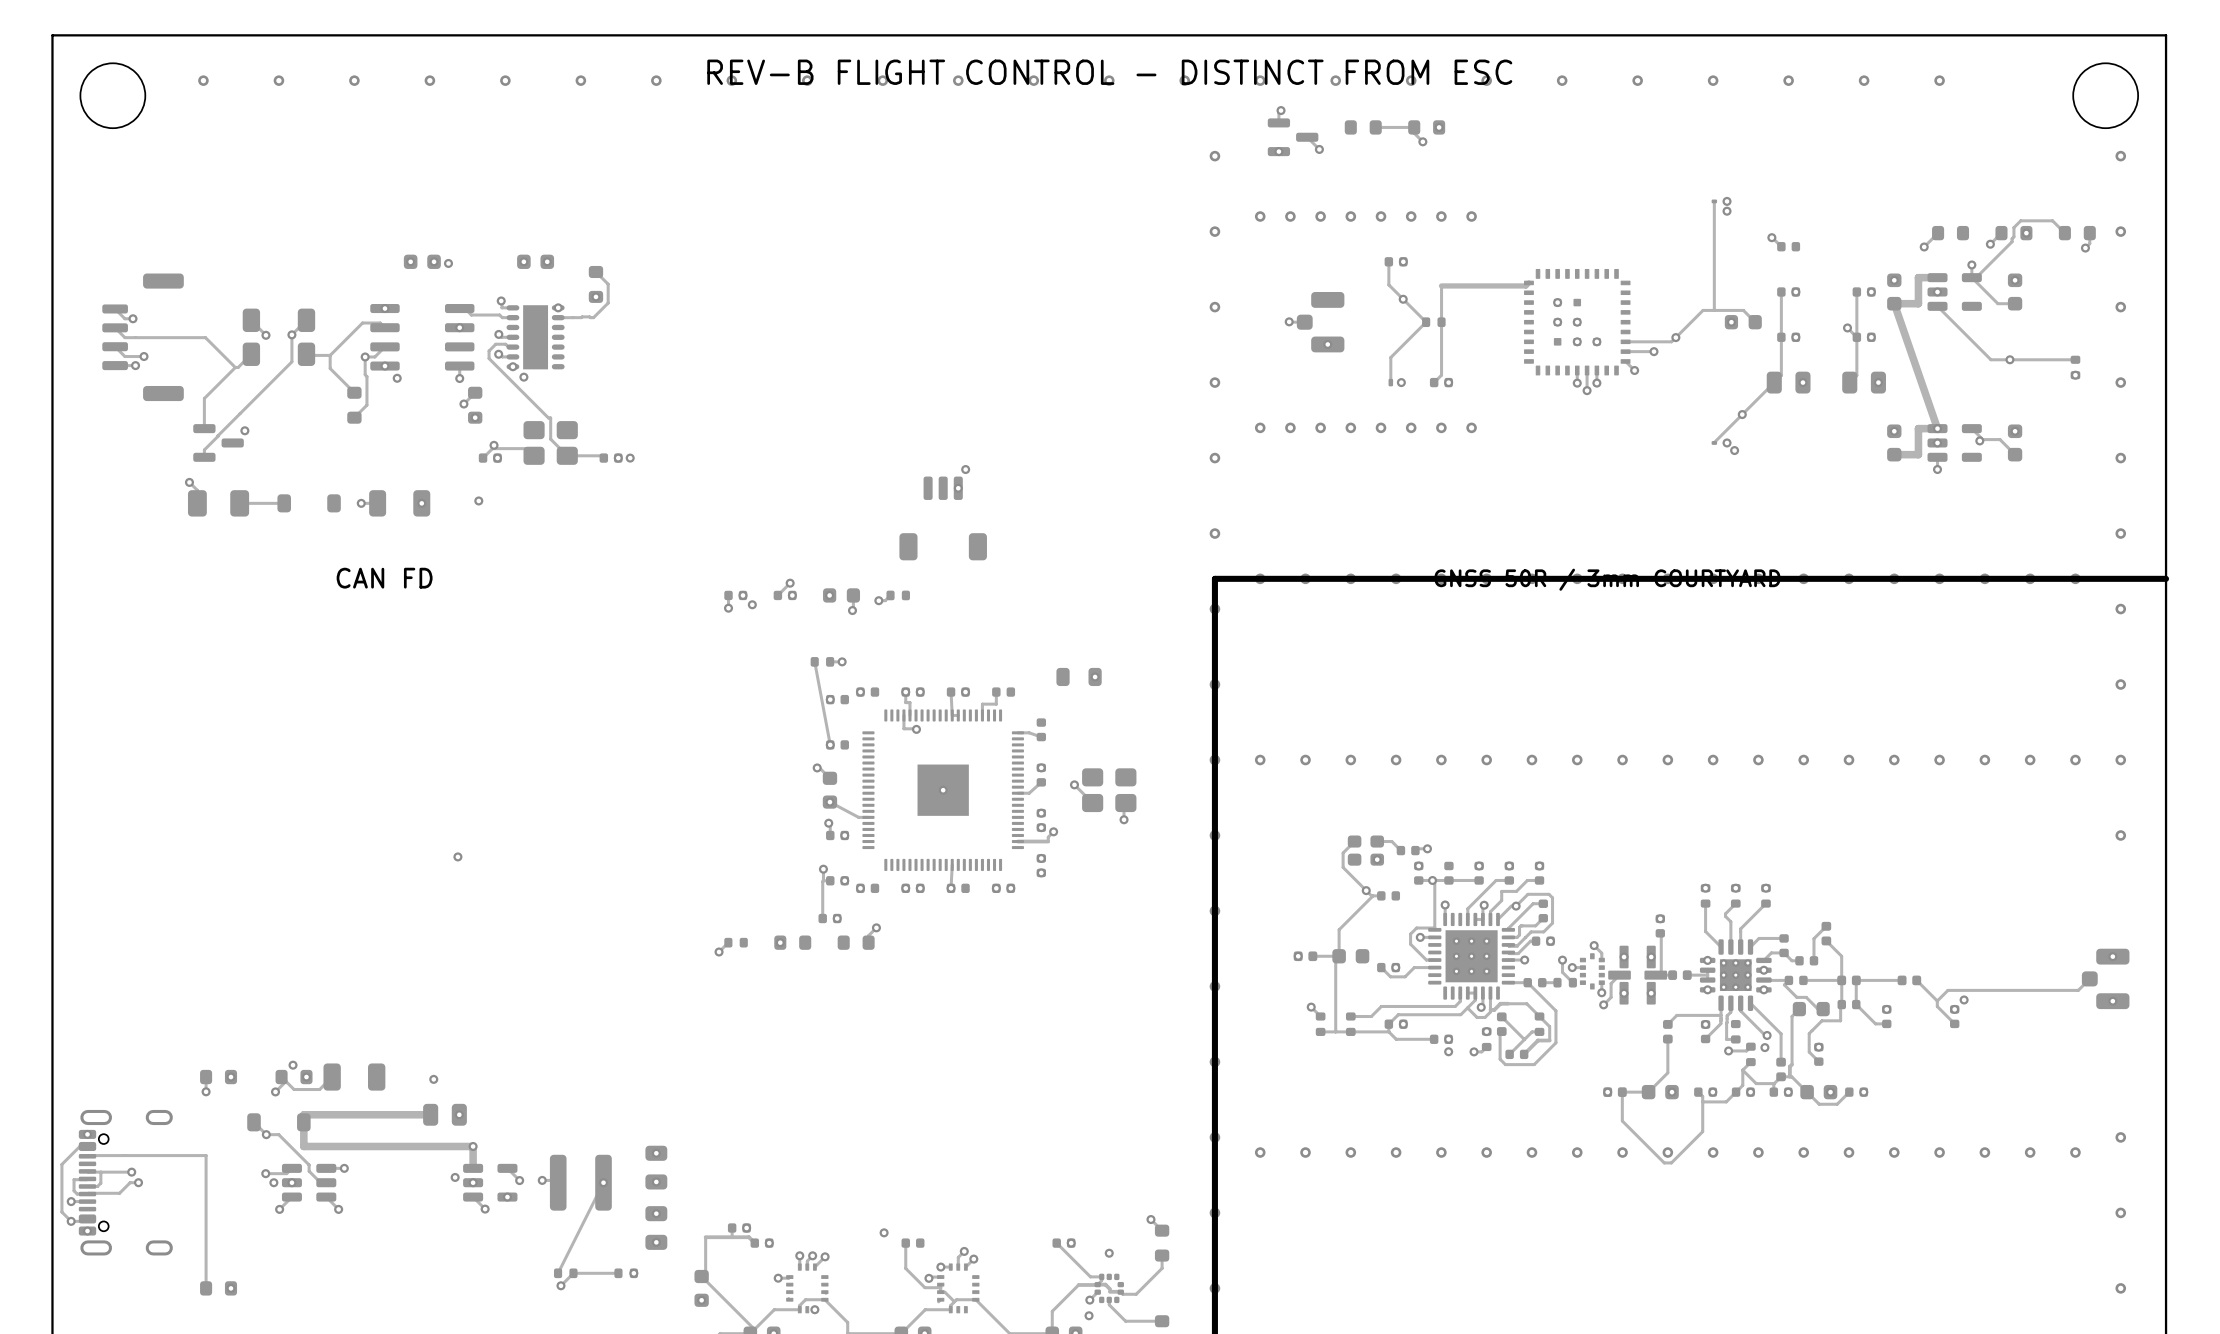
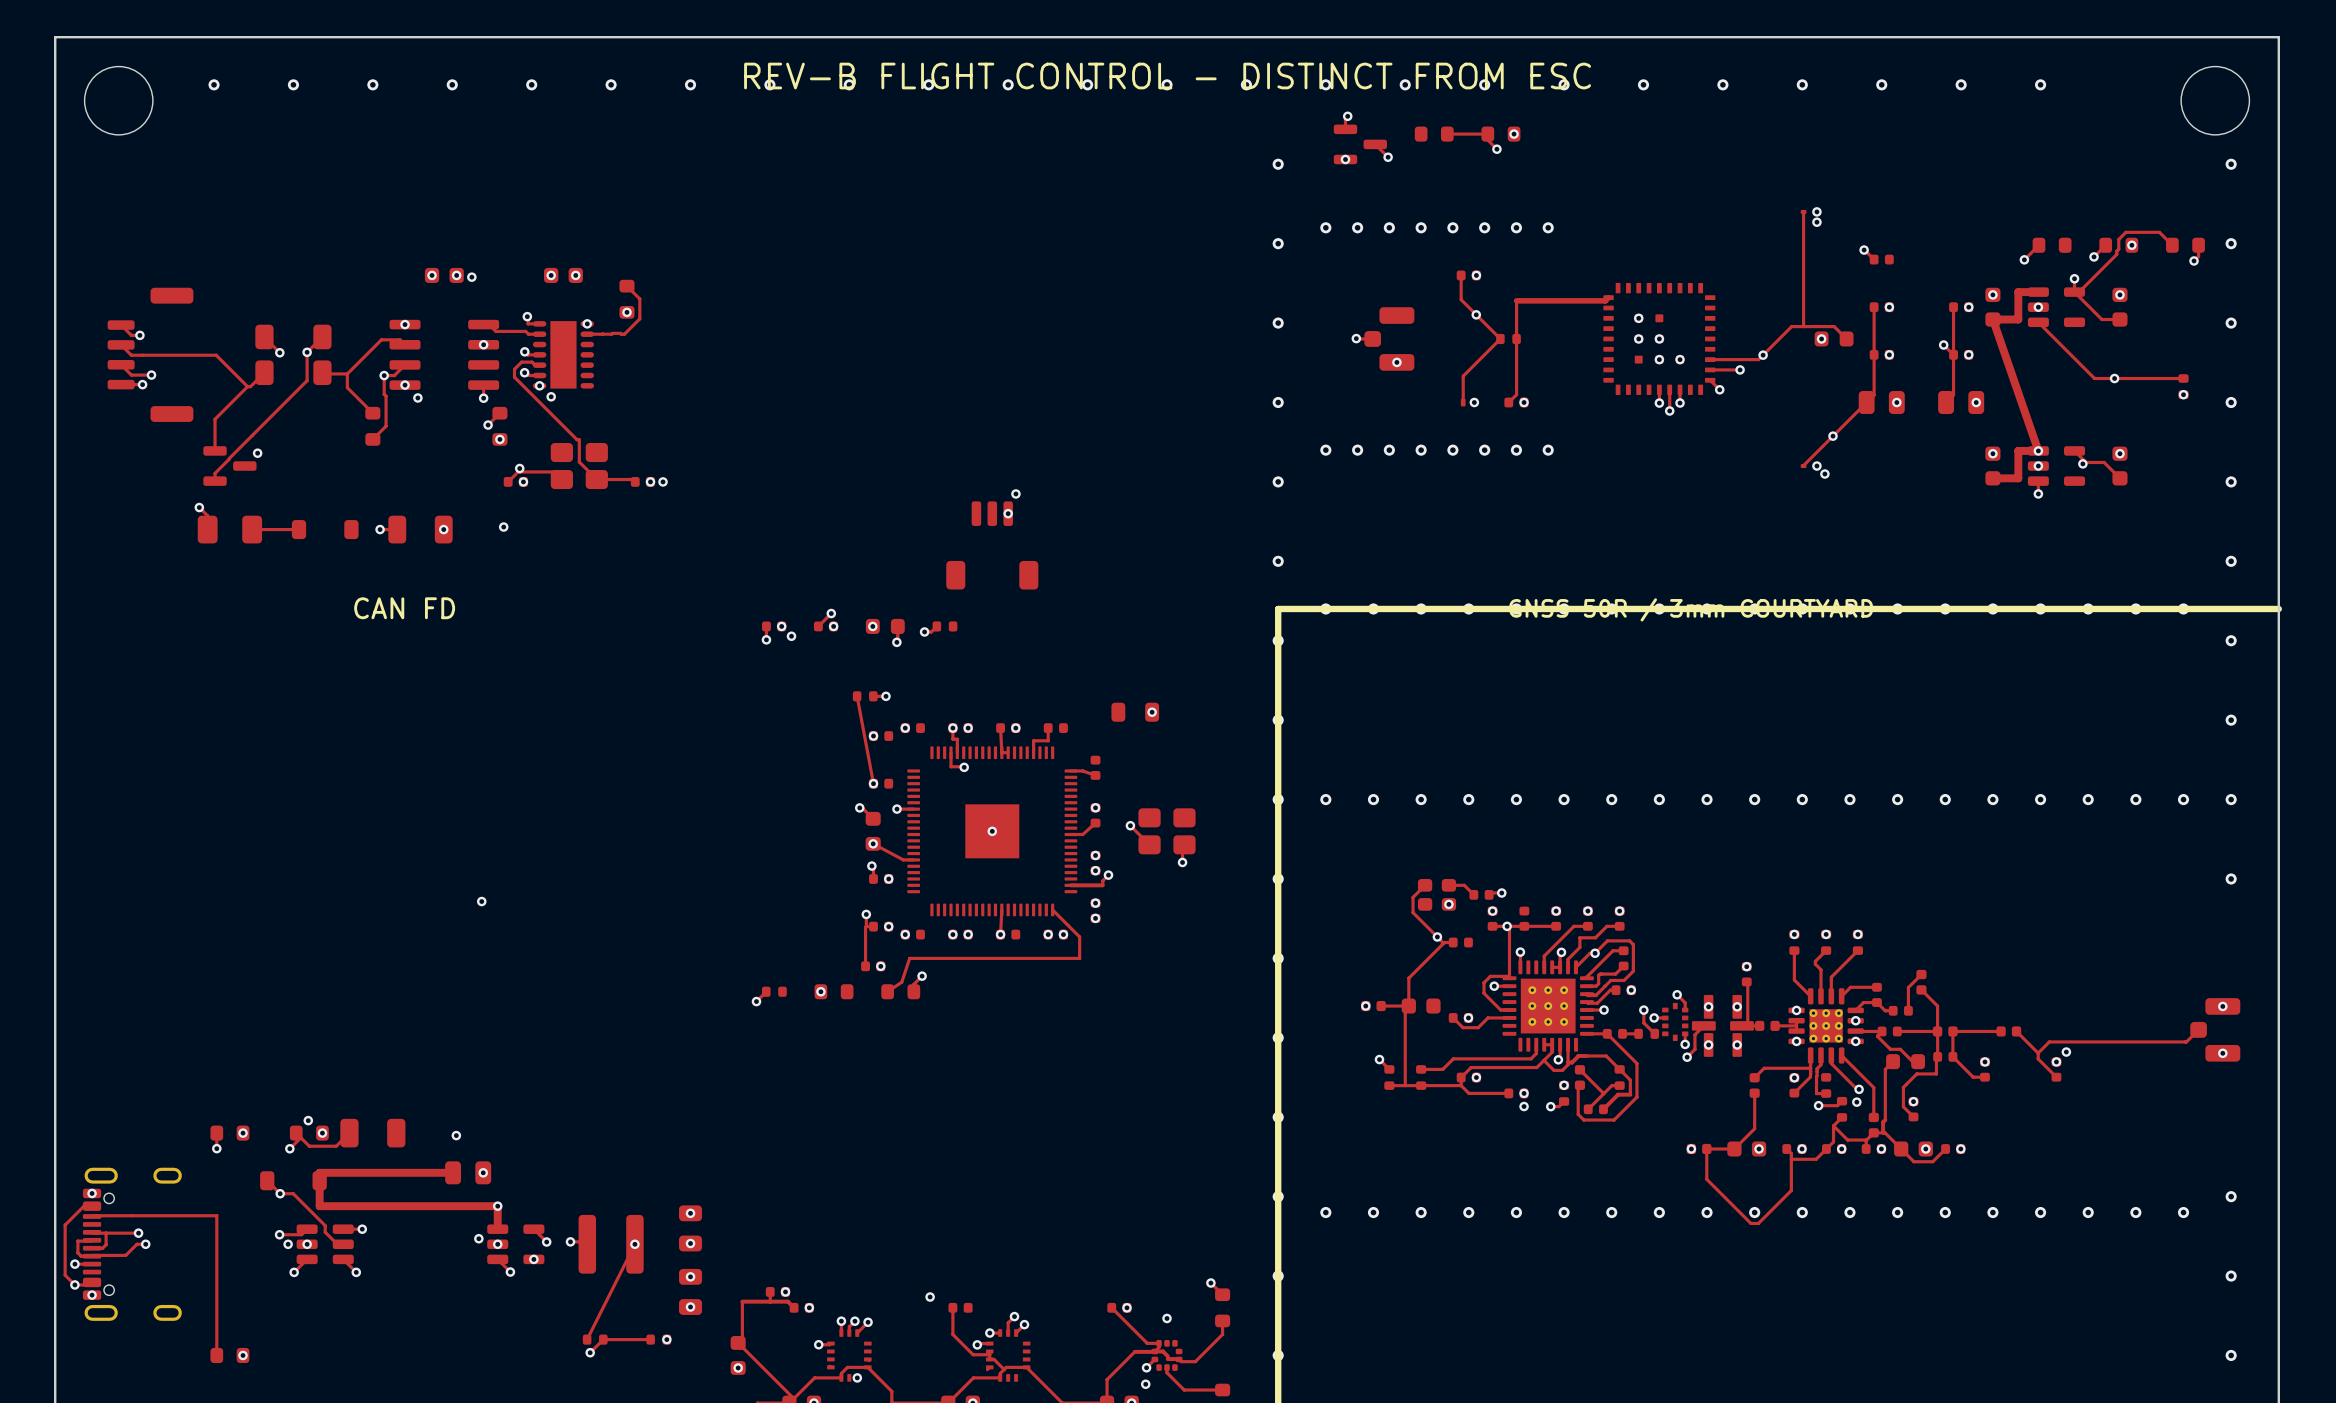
track: none -> (897, 809) (913, 809)
via: none -> (897, 809)
track: none -> (1052, 909) (1079, 936) (1079, 958) (909, 958) (901, 982) (887, 991)

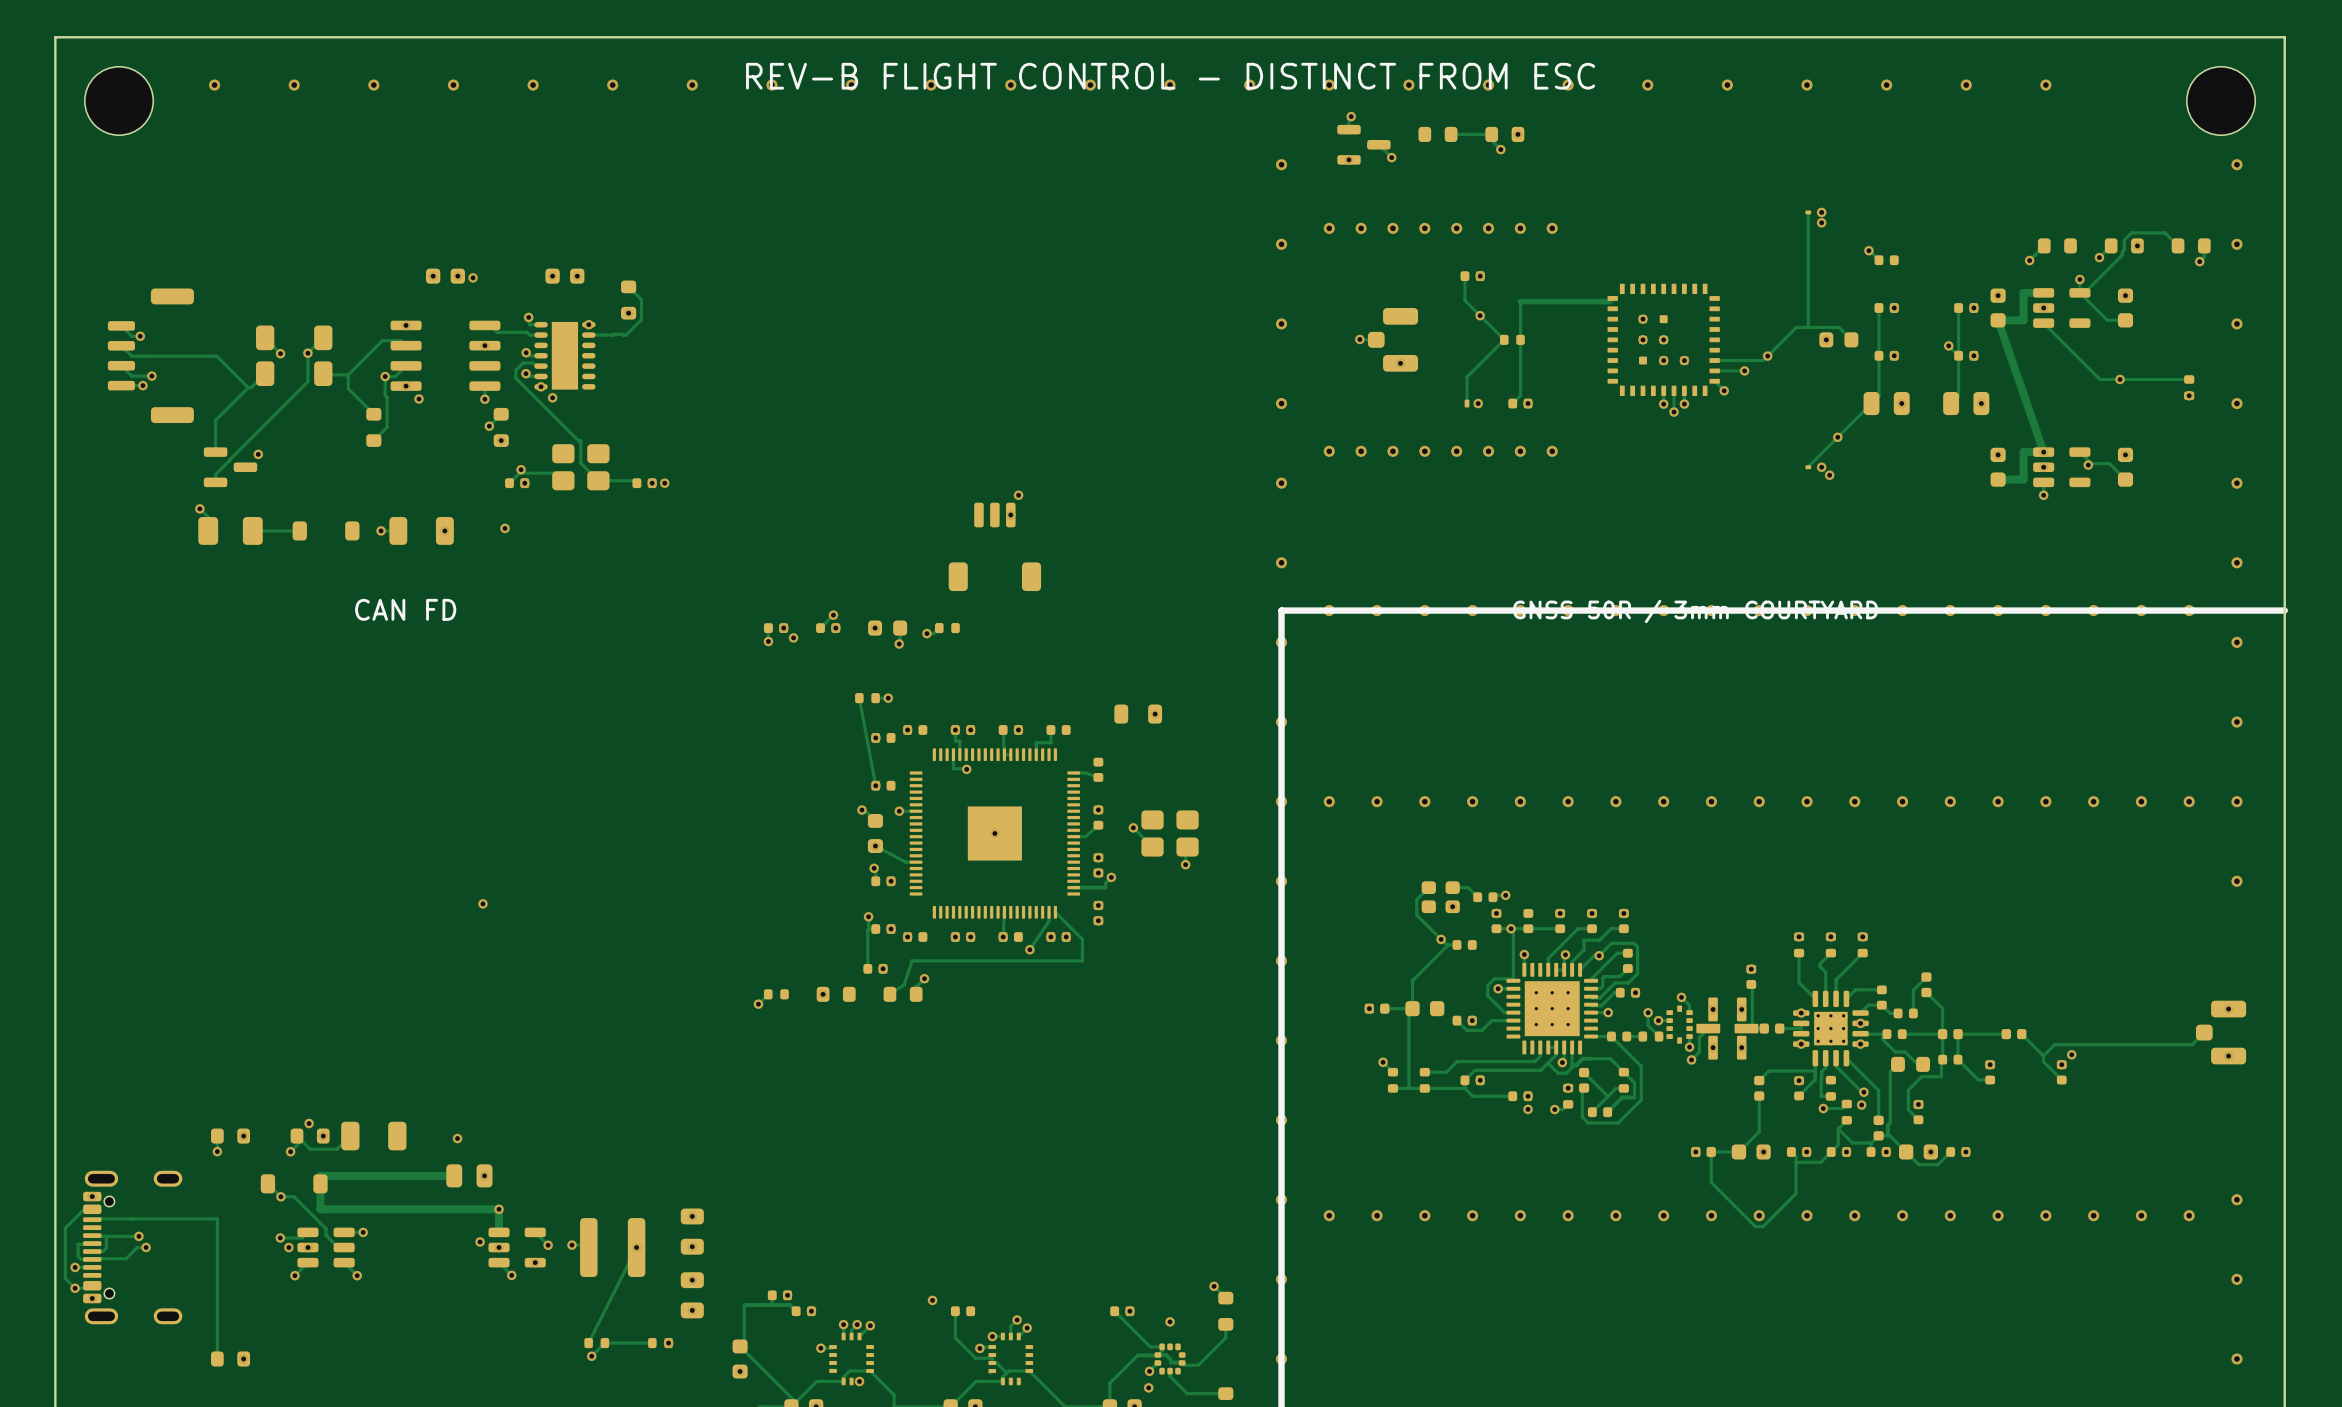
track: none -> (1049, 912) (1049, 921) (1029, 949)
via: none -> (1029, 949)

